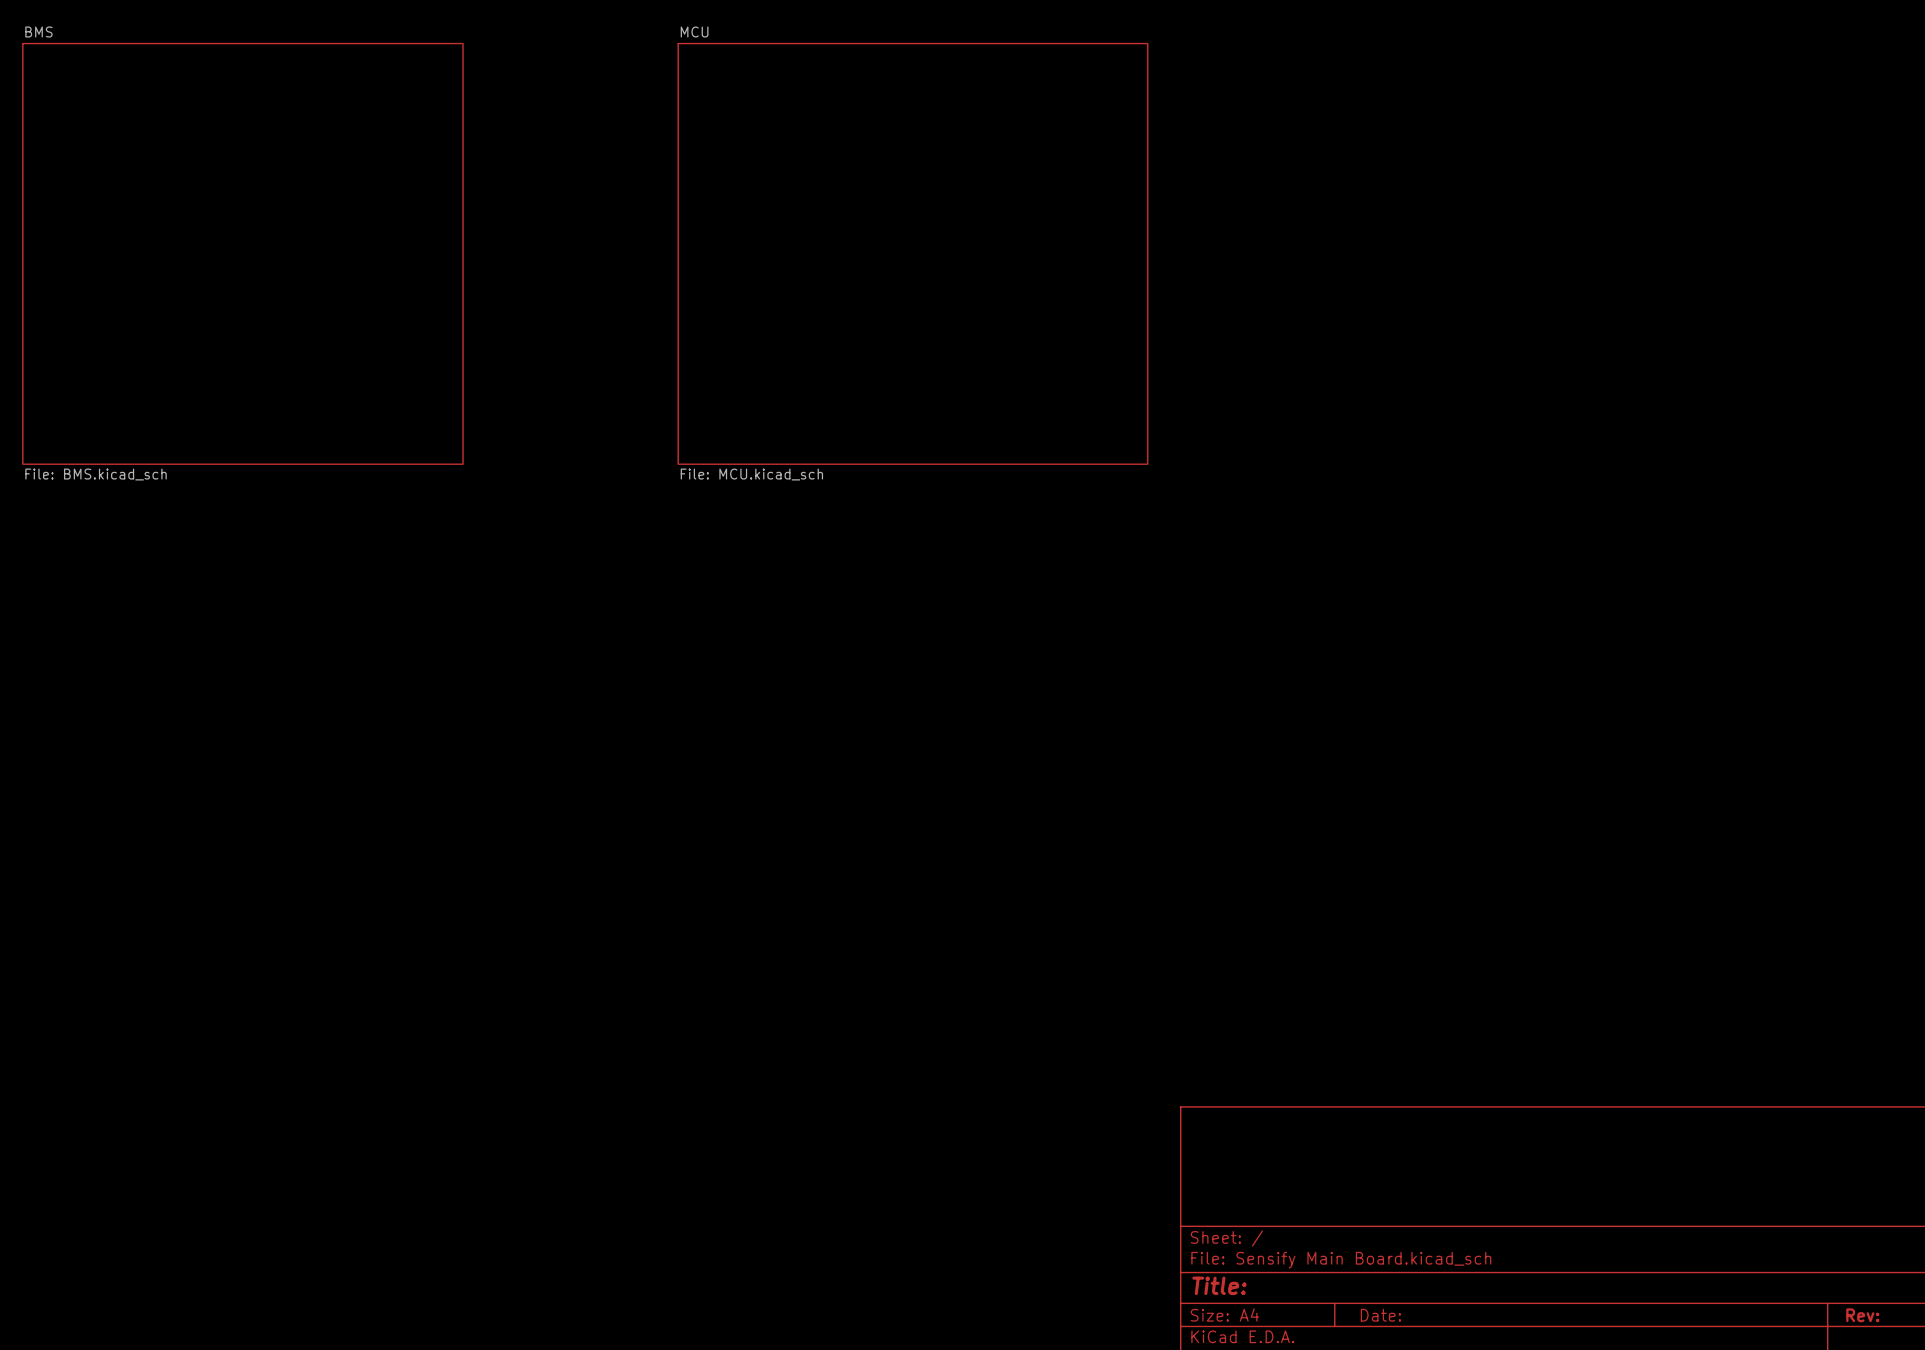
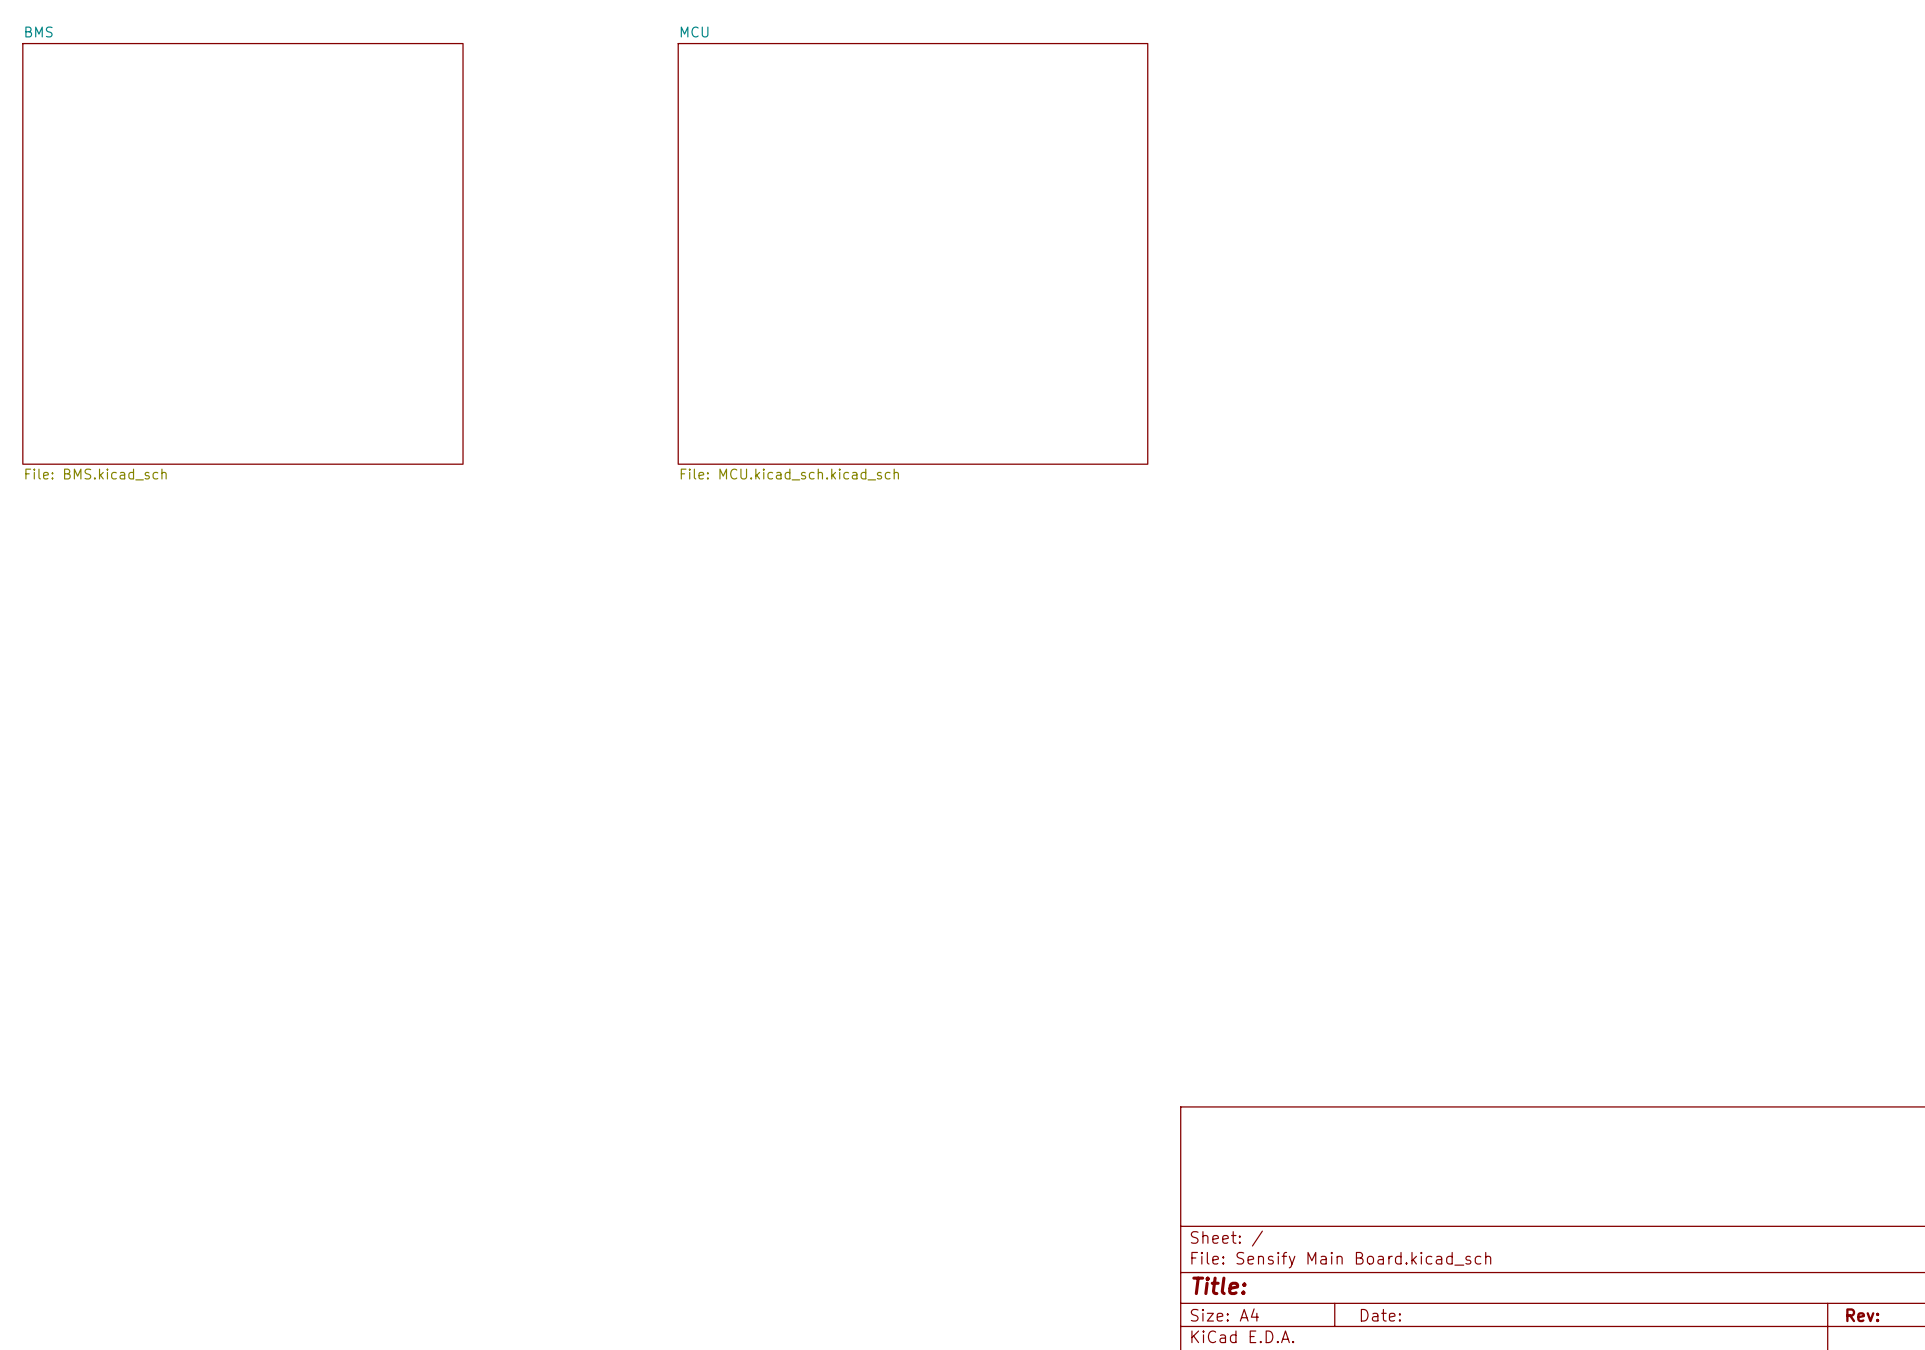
sheet MCU value: File: MCU.kicad_sch (751, 474) -> File: MCU.kicad_sch.kicad_sch (789, 474)

